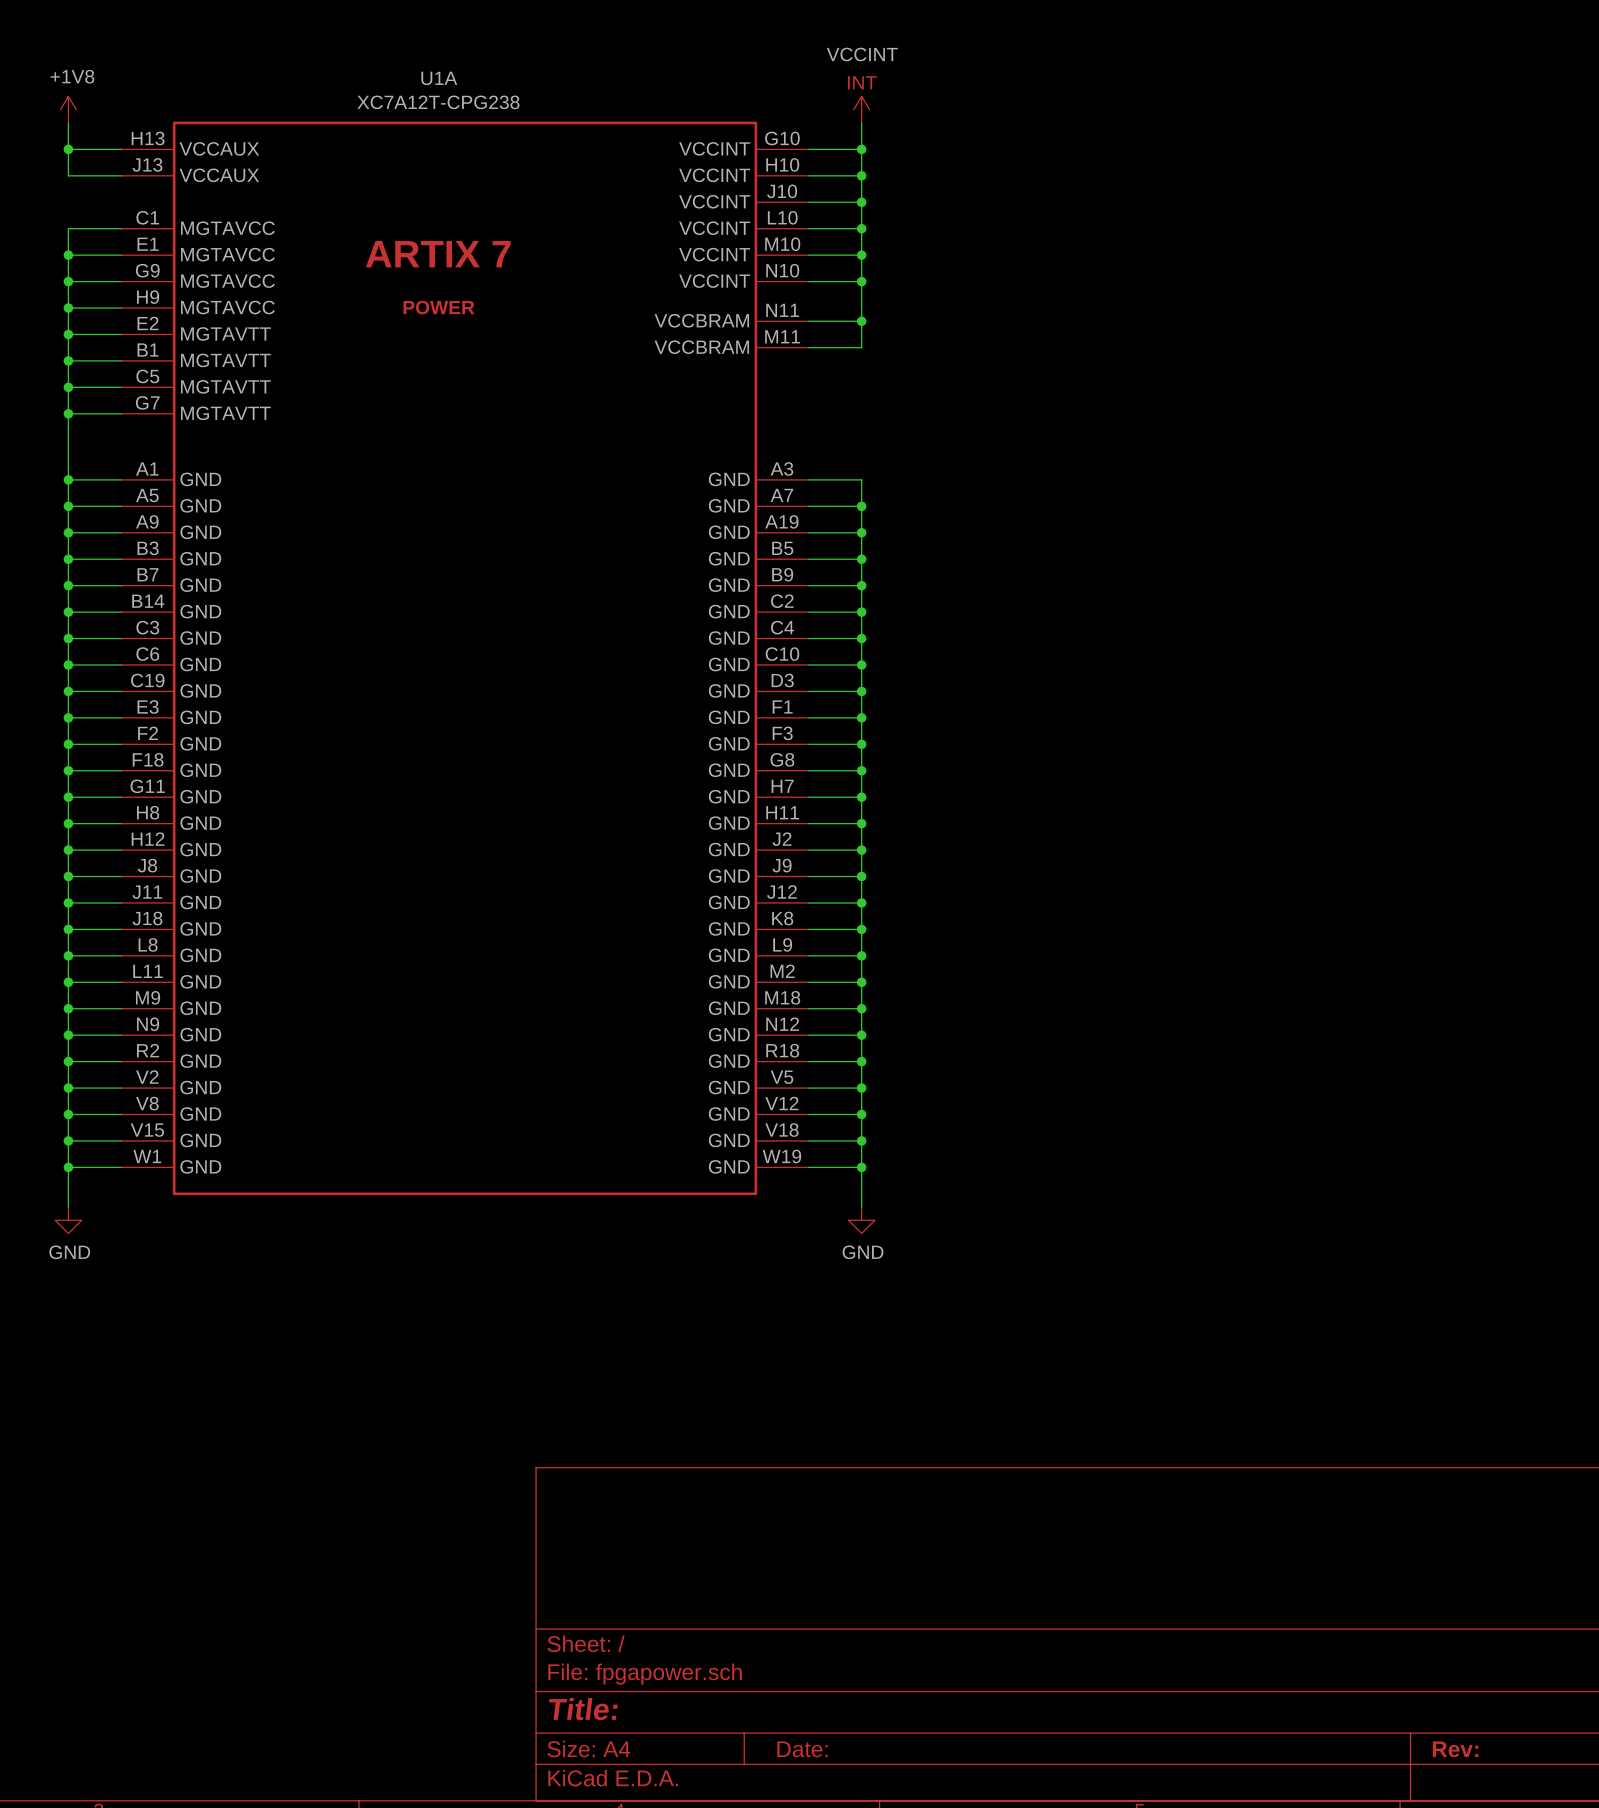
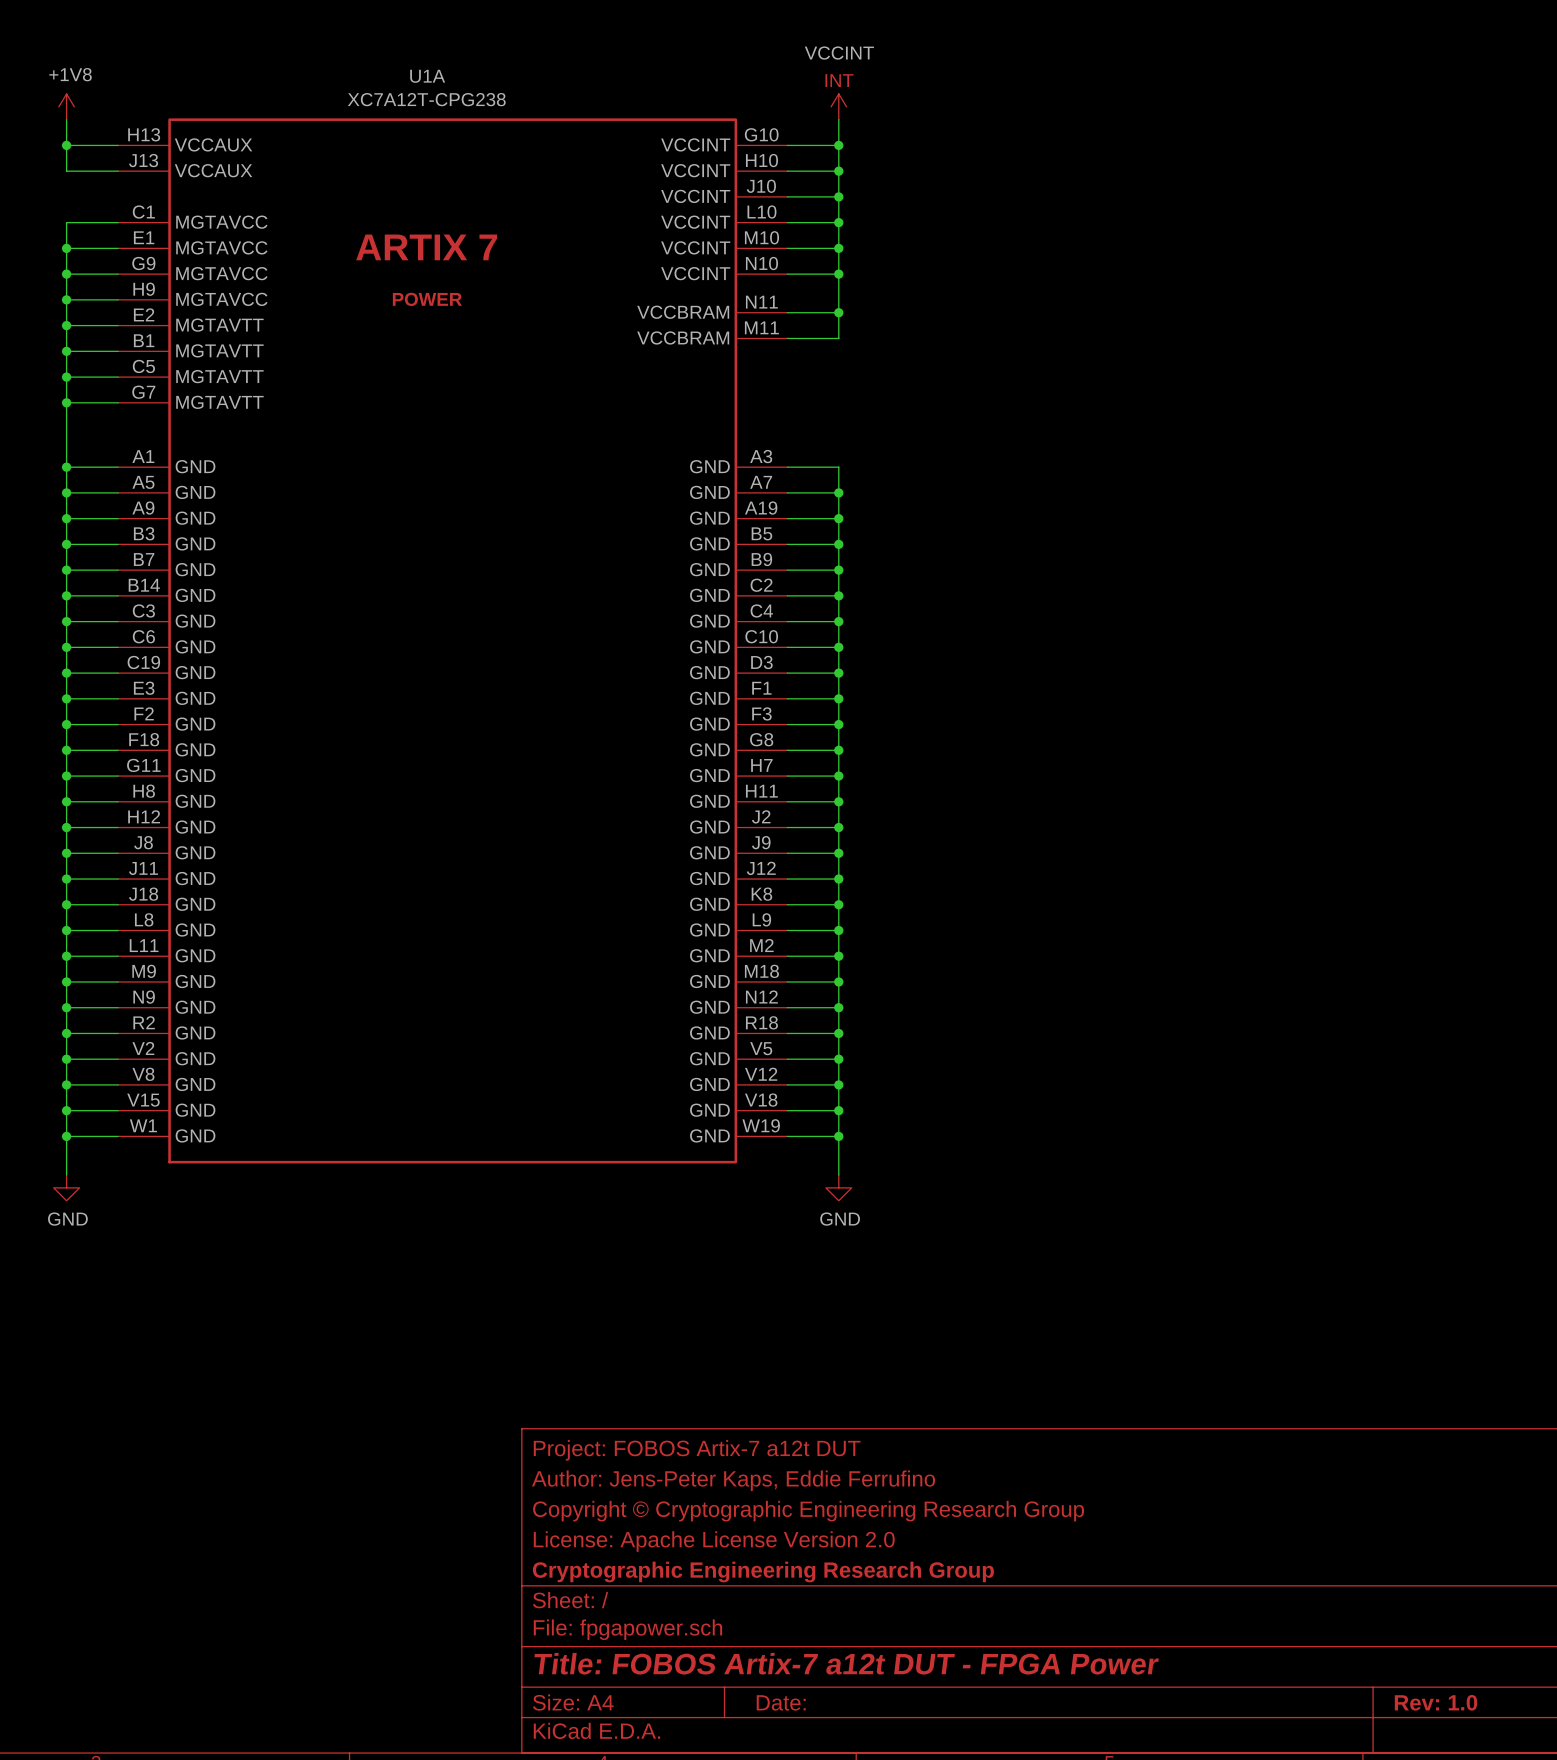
title block: none -> Project: FOBOS Artix-7 a12t DUT (697, 1450)
title block: none -> Author: Jens-Peter Kaps, Eddie Ferrufino (733, 1480)
title block: none -> Copyright © Cryptographic Engineering Research Group (808, 1511)
title block: none -> License: Apache License Version 2.0 (714, 1541)
title block: none -> Cryptographic Engineering Research Group (763, 1571)
title block: Title: (583, 1709) -> Title: FOBOS Artix-7 a12t DUT - FPGA Power (846, 1663)
title block: Rev: (1455, 1749) -> Rev: 1.0 (1436, 1702)

